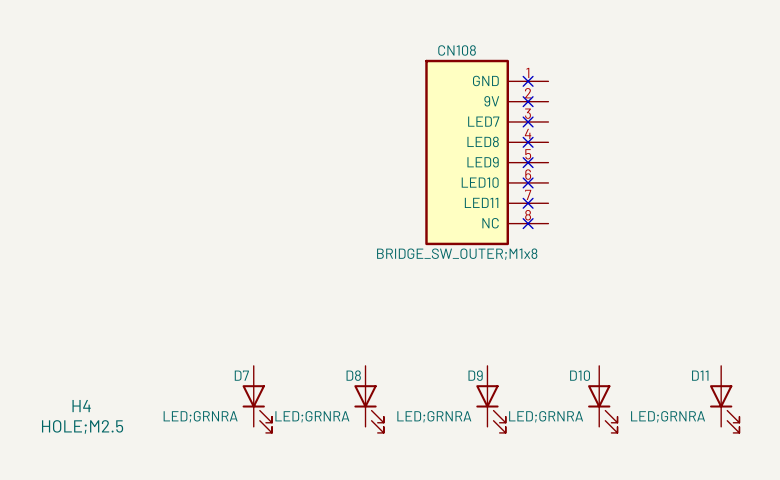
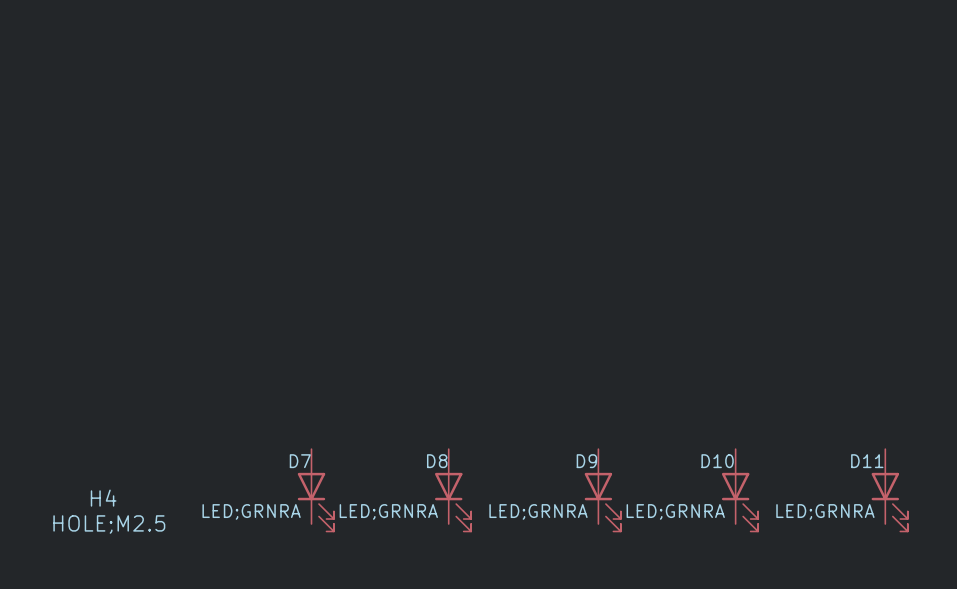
no-connect mark: (528, 81) -> none
no-connect mark: (528, 101) -> none
no-connect mark: (528, 121) -> none
no-connect mark: (528, 142) -> none
CN108: BRIDGE_SW_OUTER;M1x8 (486, 152) -> none
no-connect mark: (528, 162) -> none
no-connect mark: (528, 182) -> none
no-connect mark: (528, 203) -> none
no-connect mark: (528, 223) -> none

